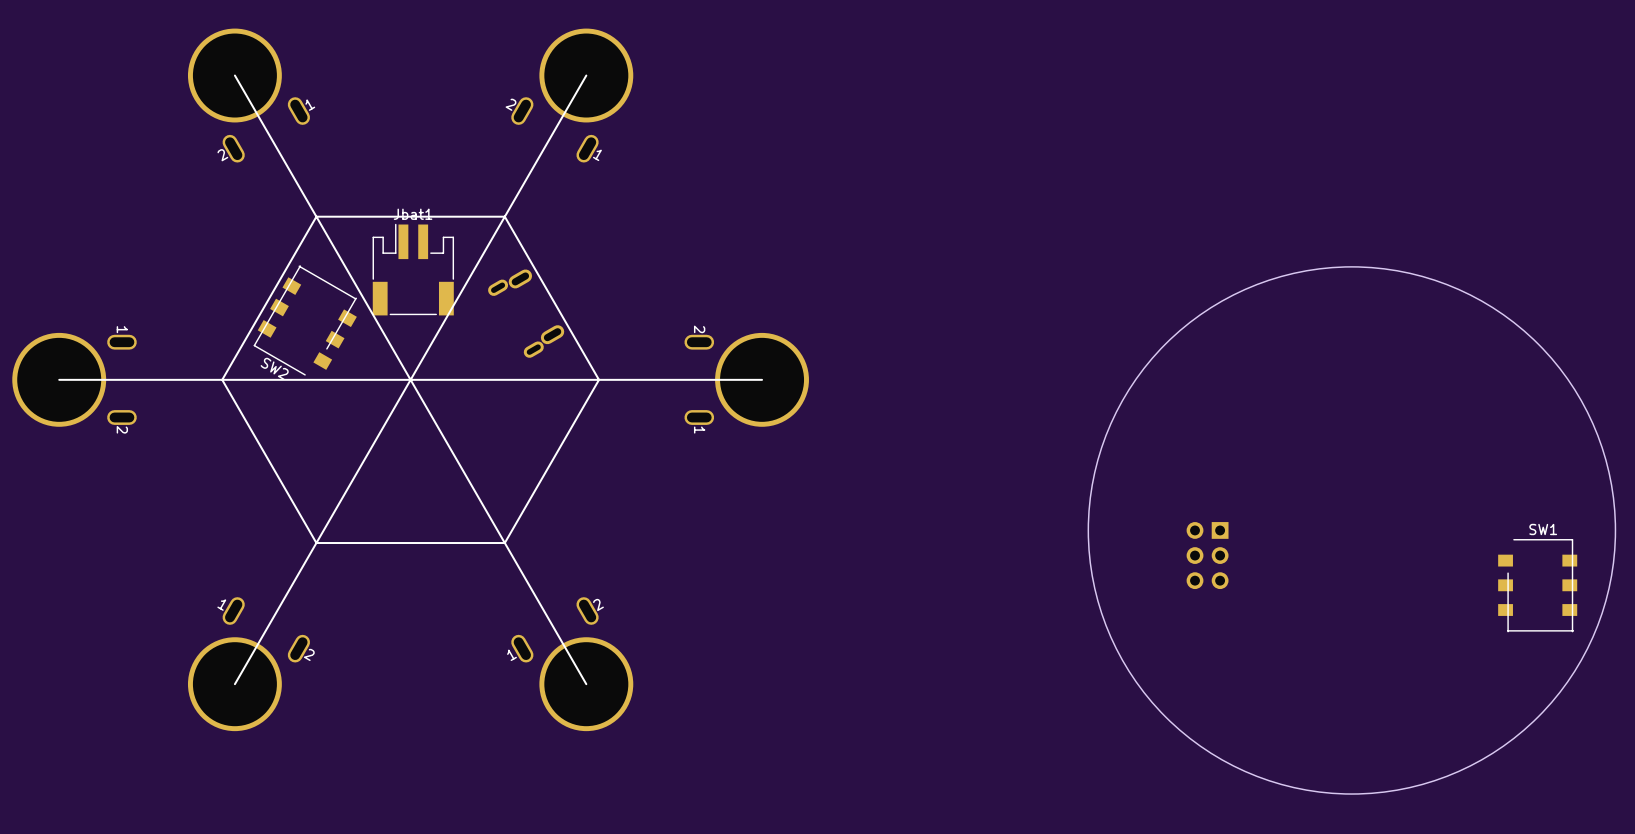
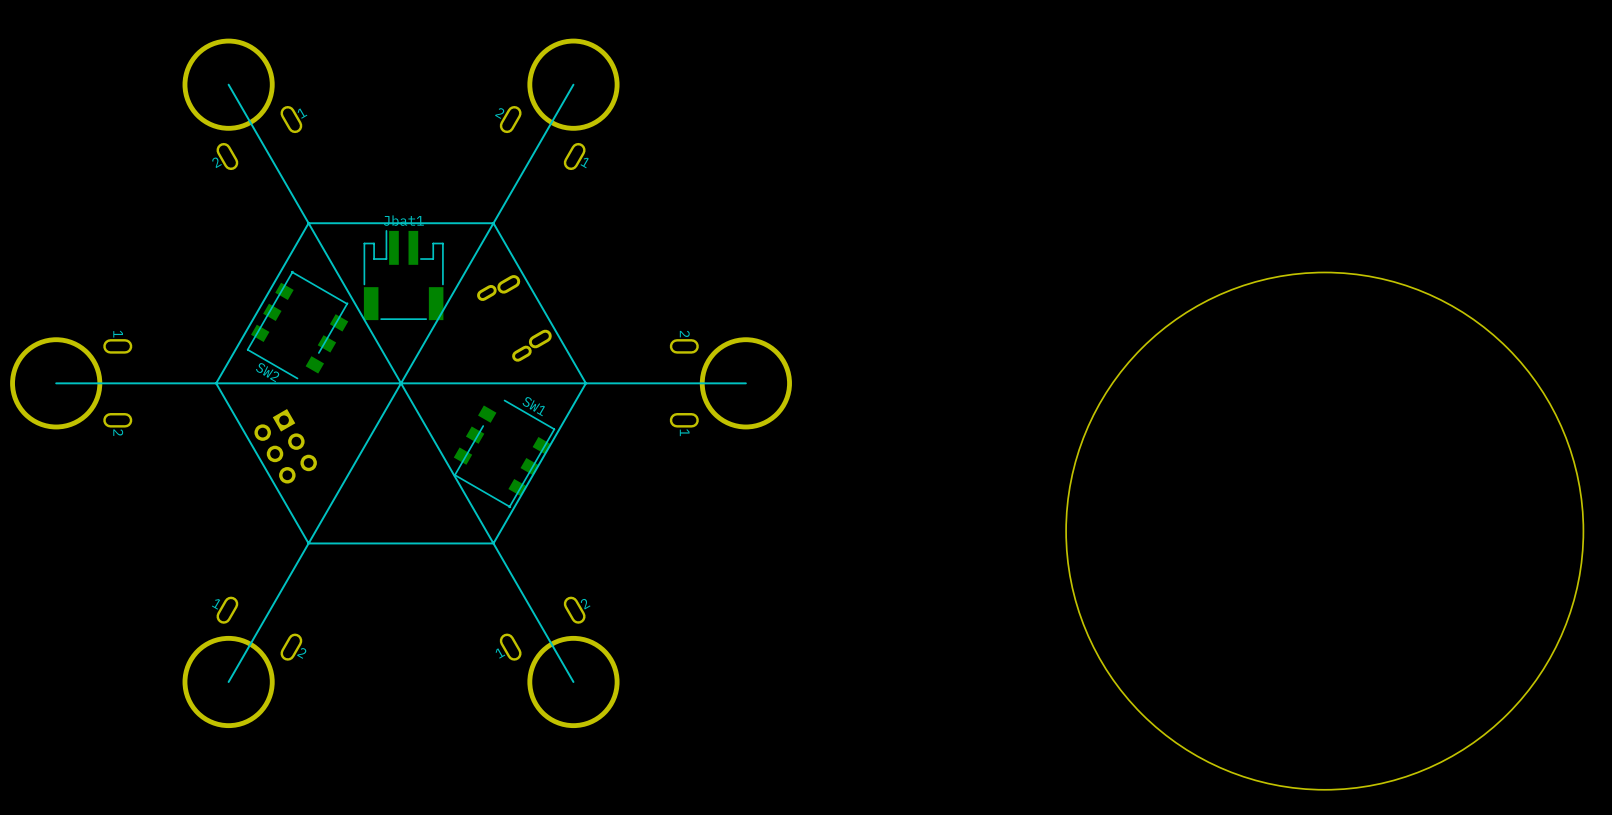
part: none -> (285, 446)
part: (1207, 555) -> none
SW1 rotation: 0° (1537, 585) -> 30° clockwise (504, 453)
SW1 position: (1537, 585) -> (504, 453)

